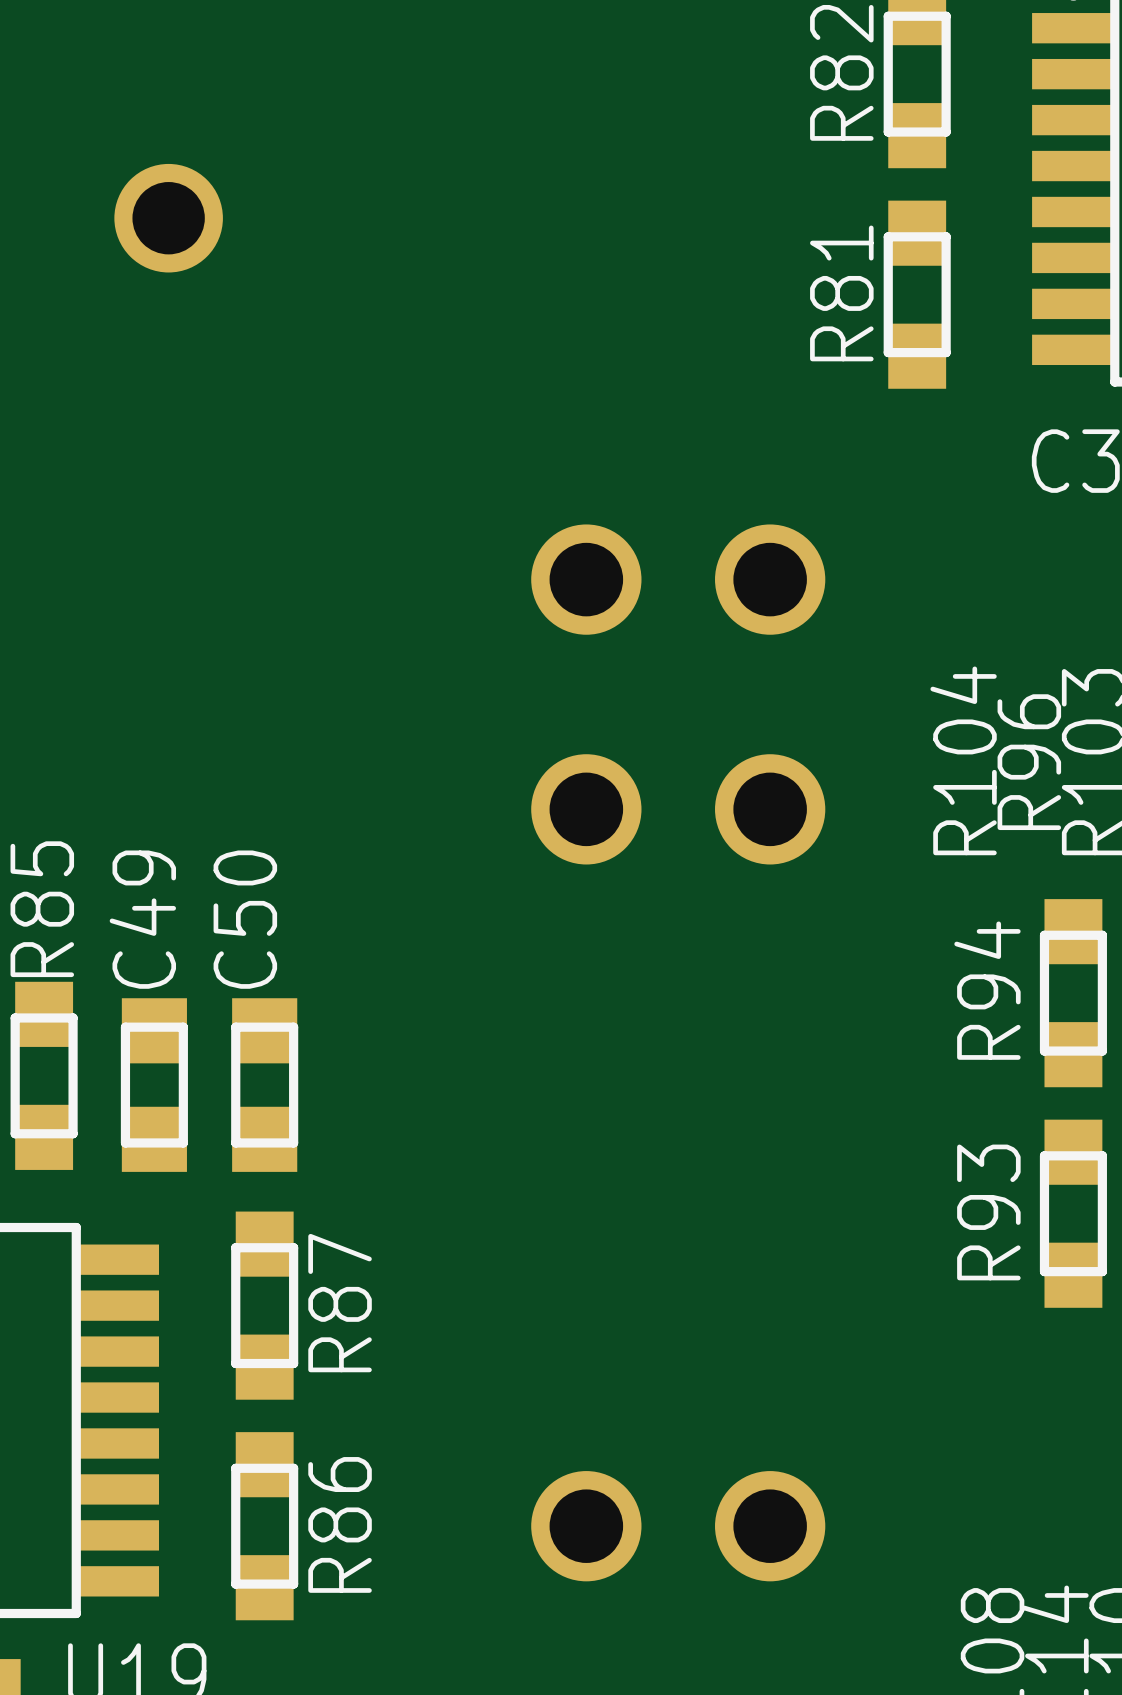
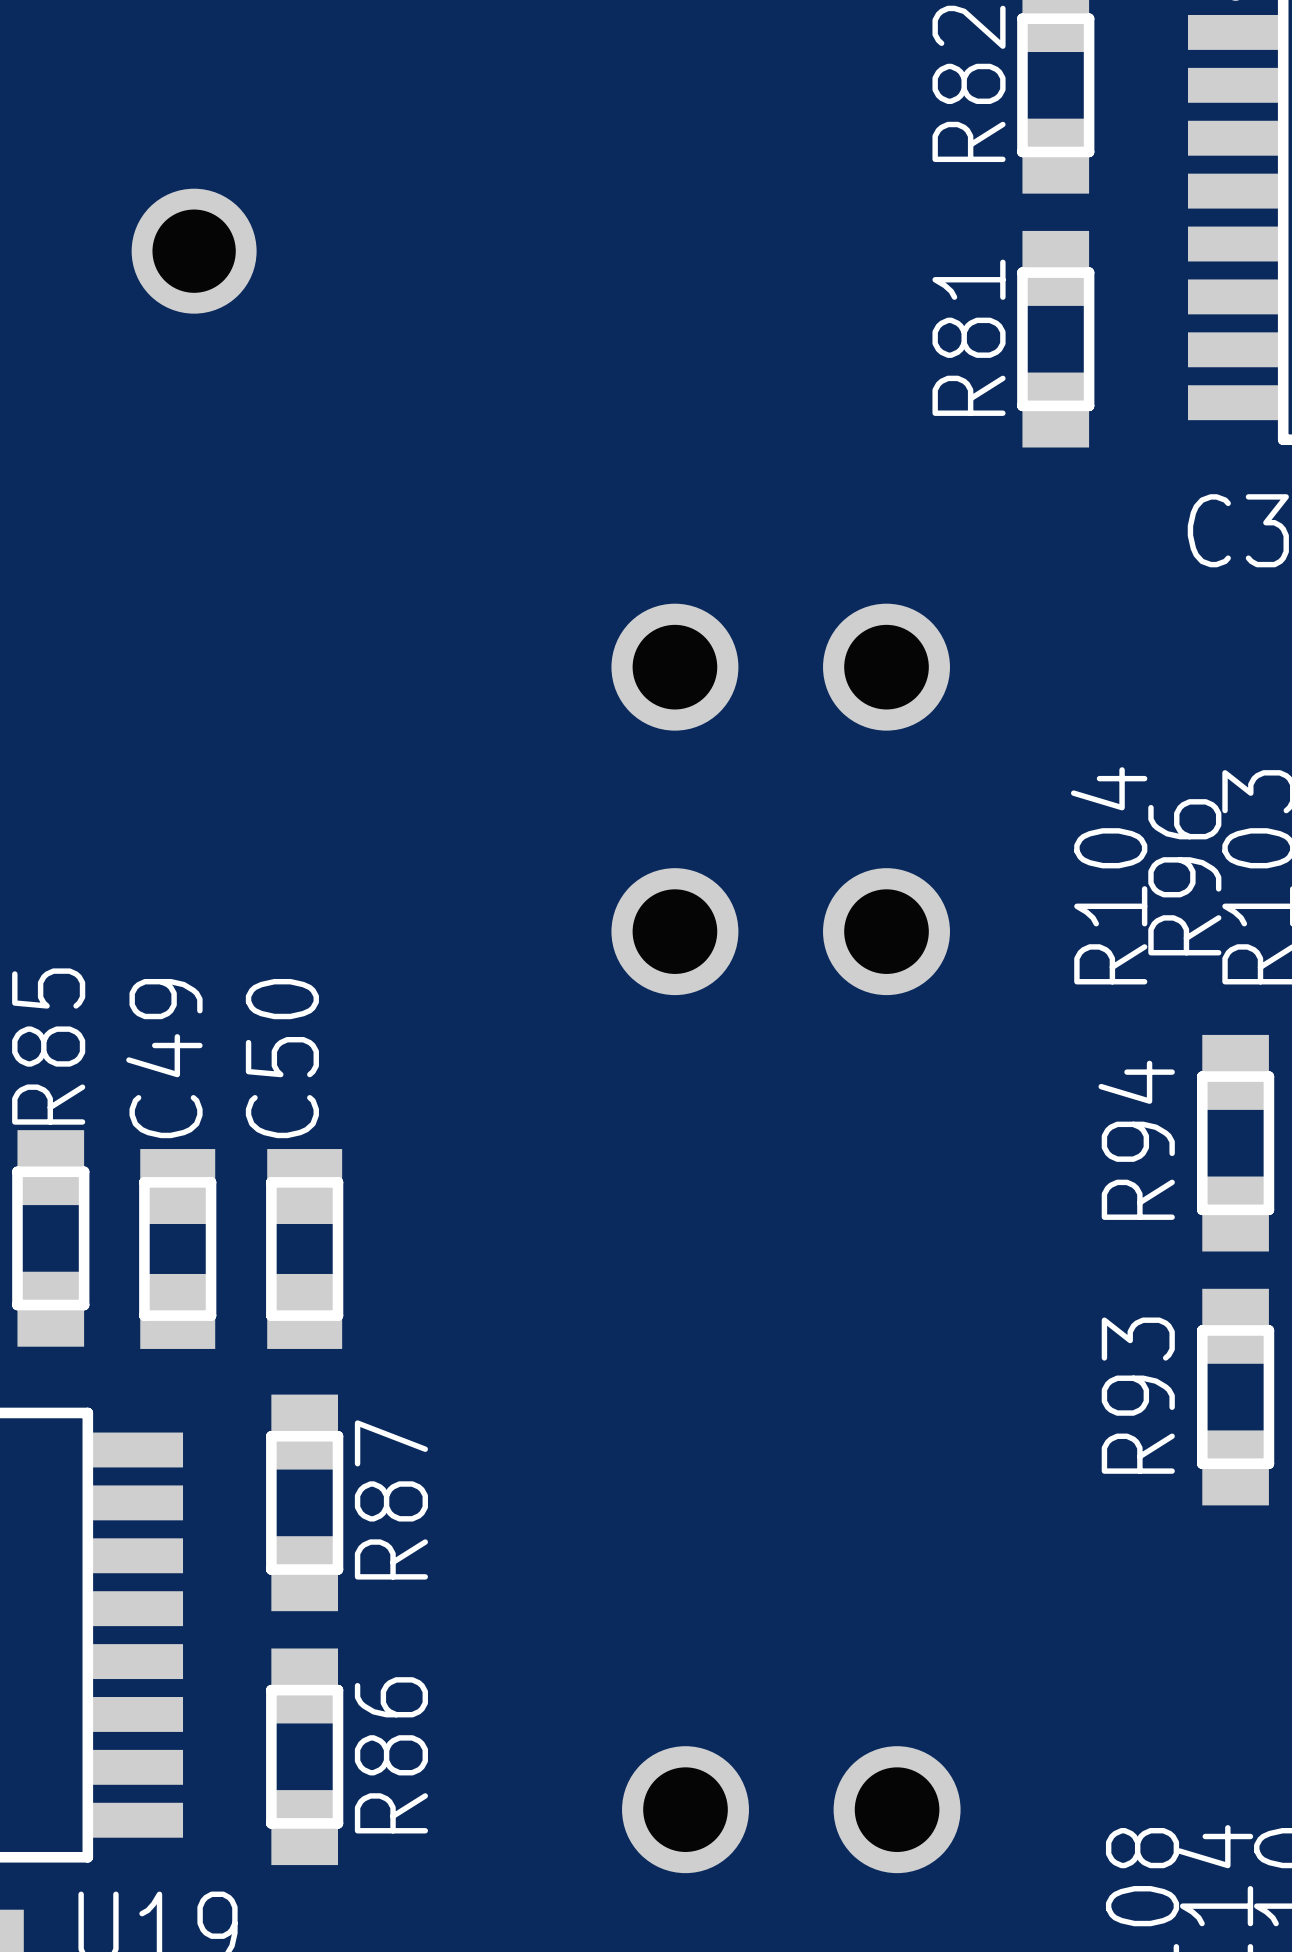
part position: (678, 1526) -> (791, 1809)

